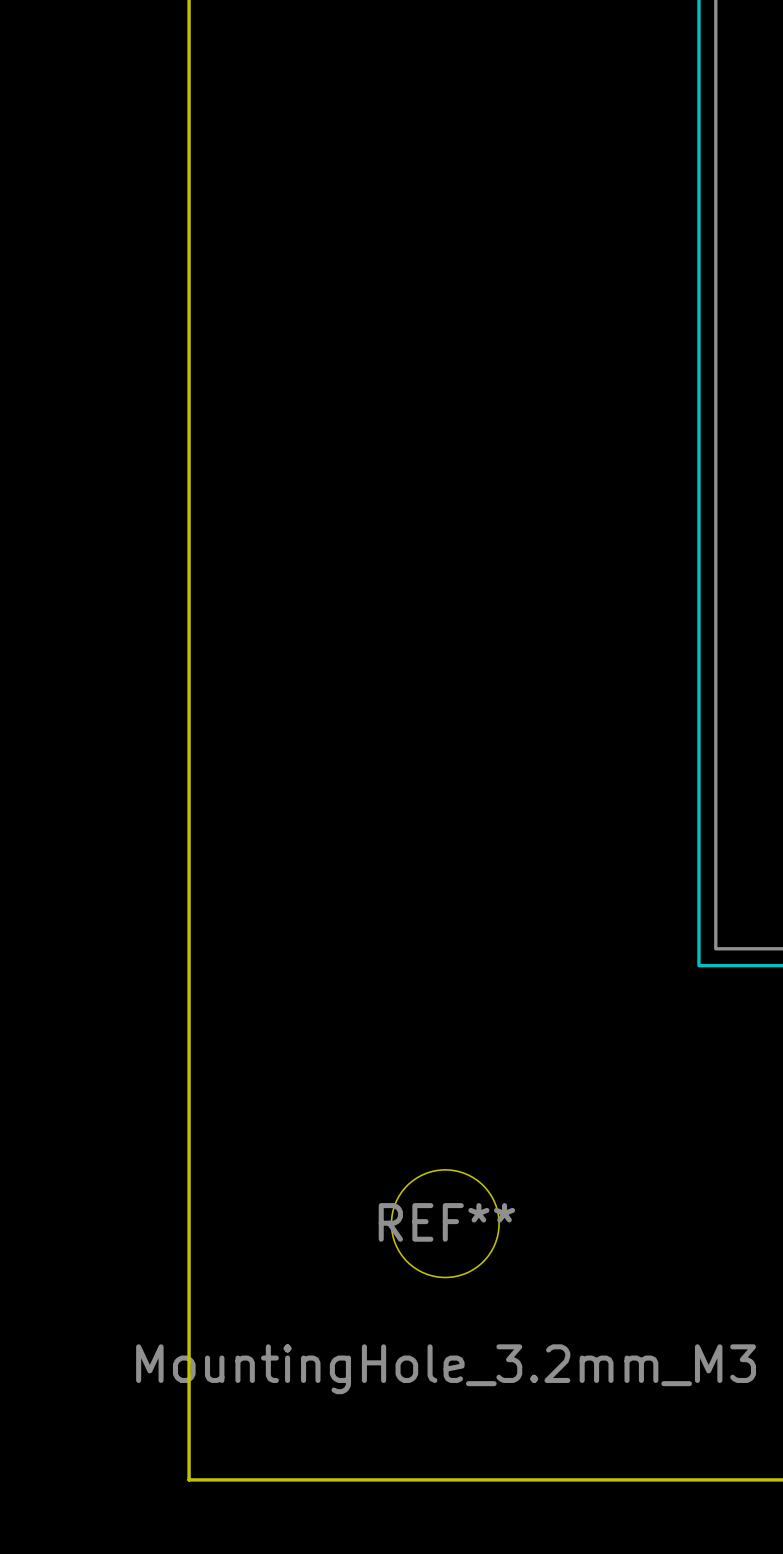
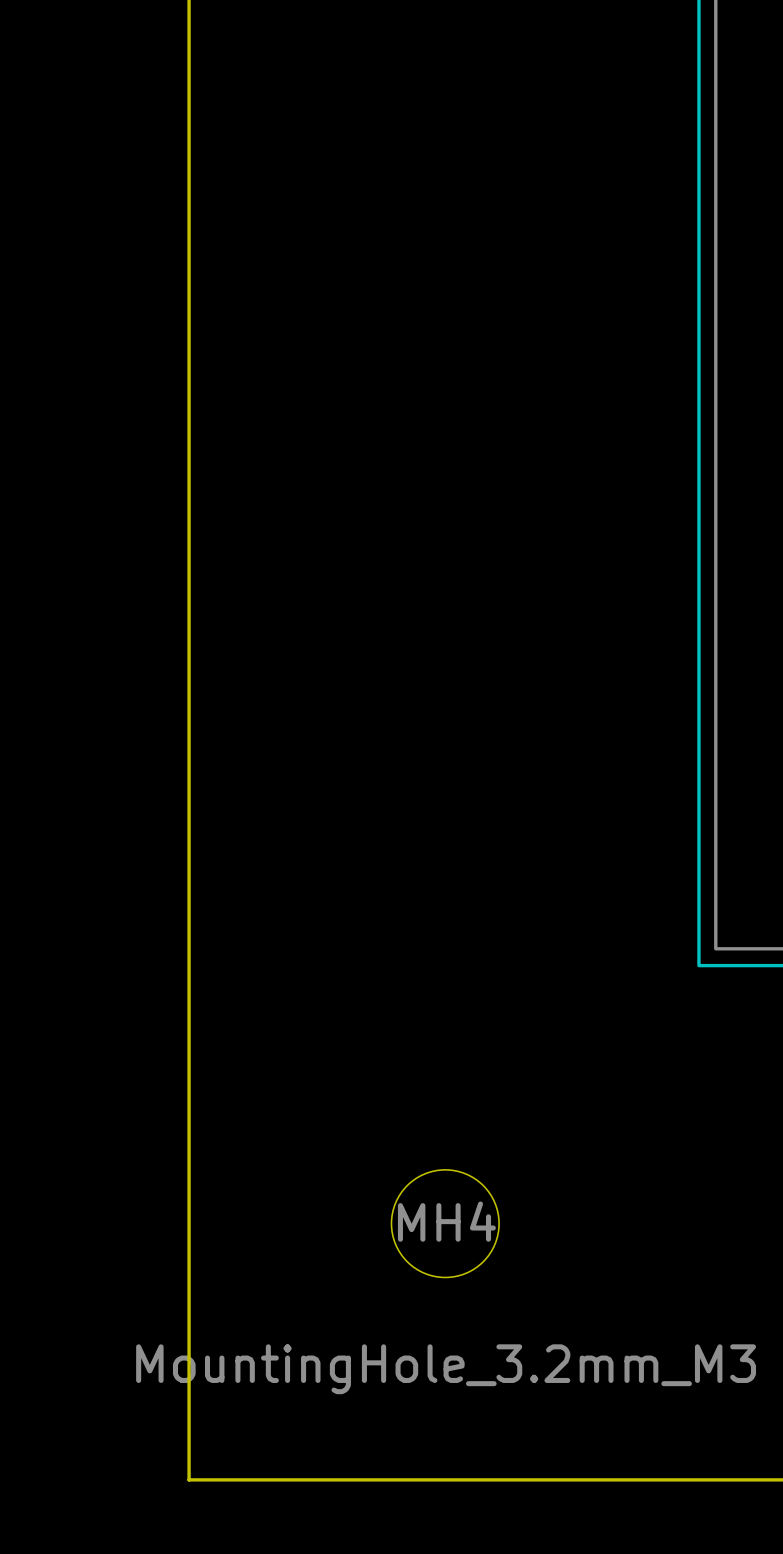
REF** name: REF** (446, 1222) -> MH4 (446, 1221)

